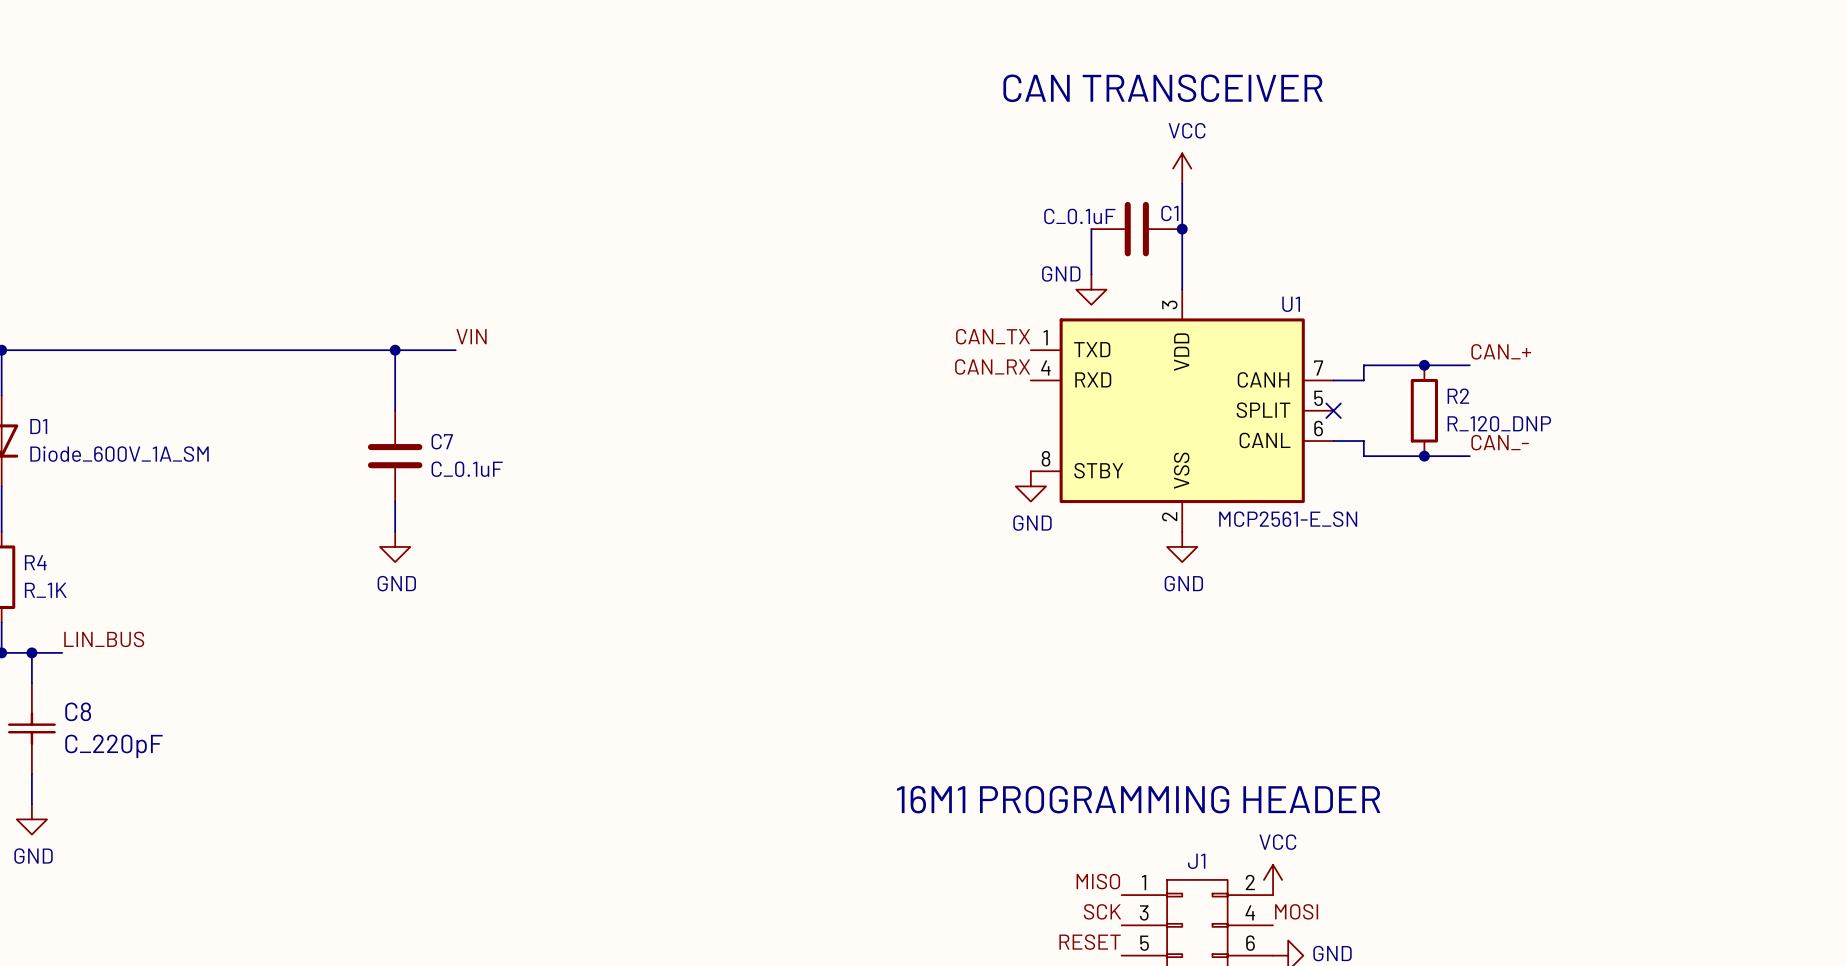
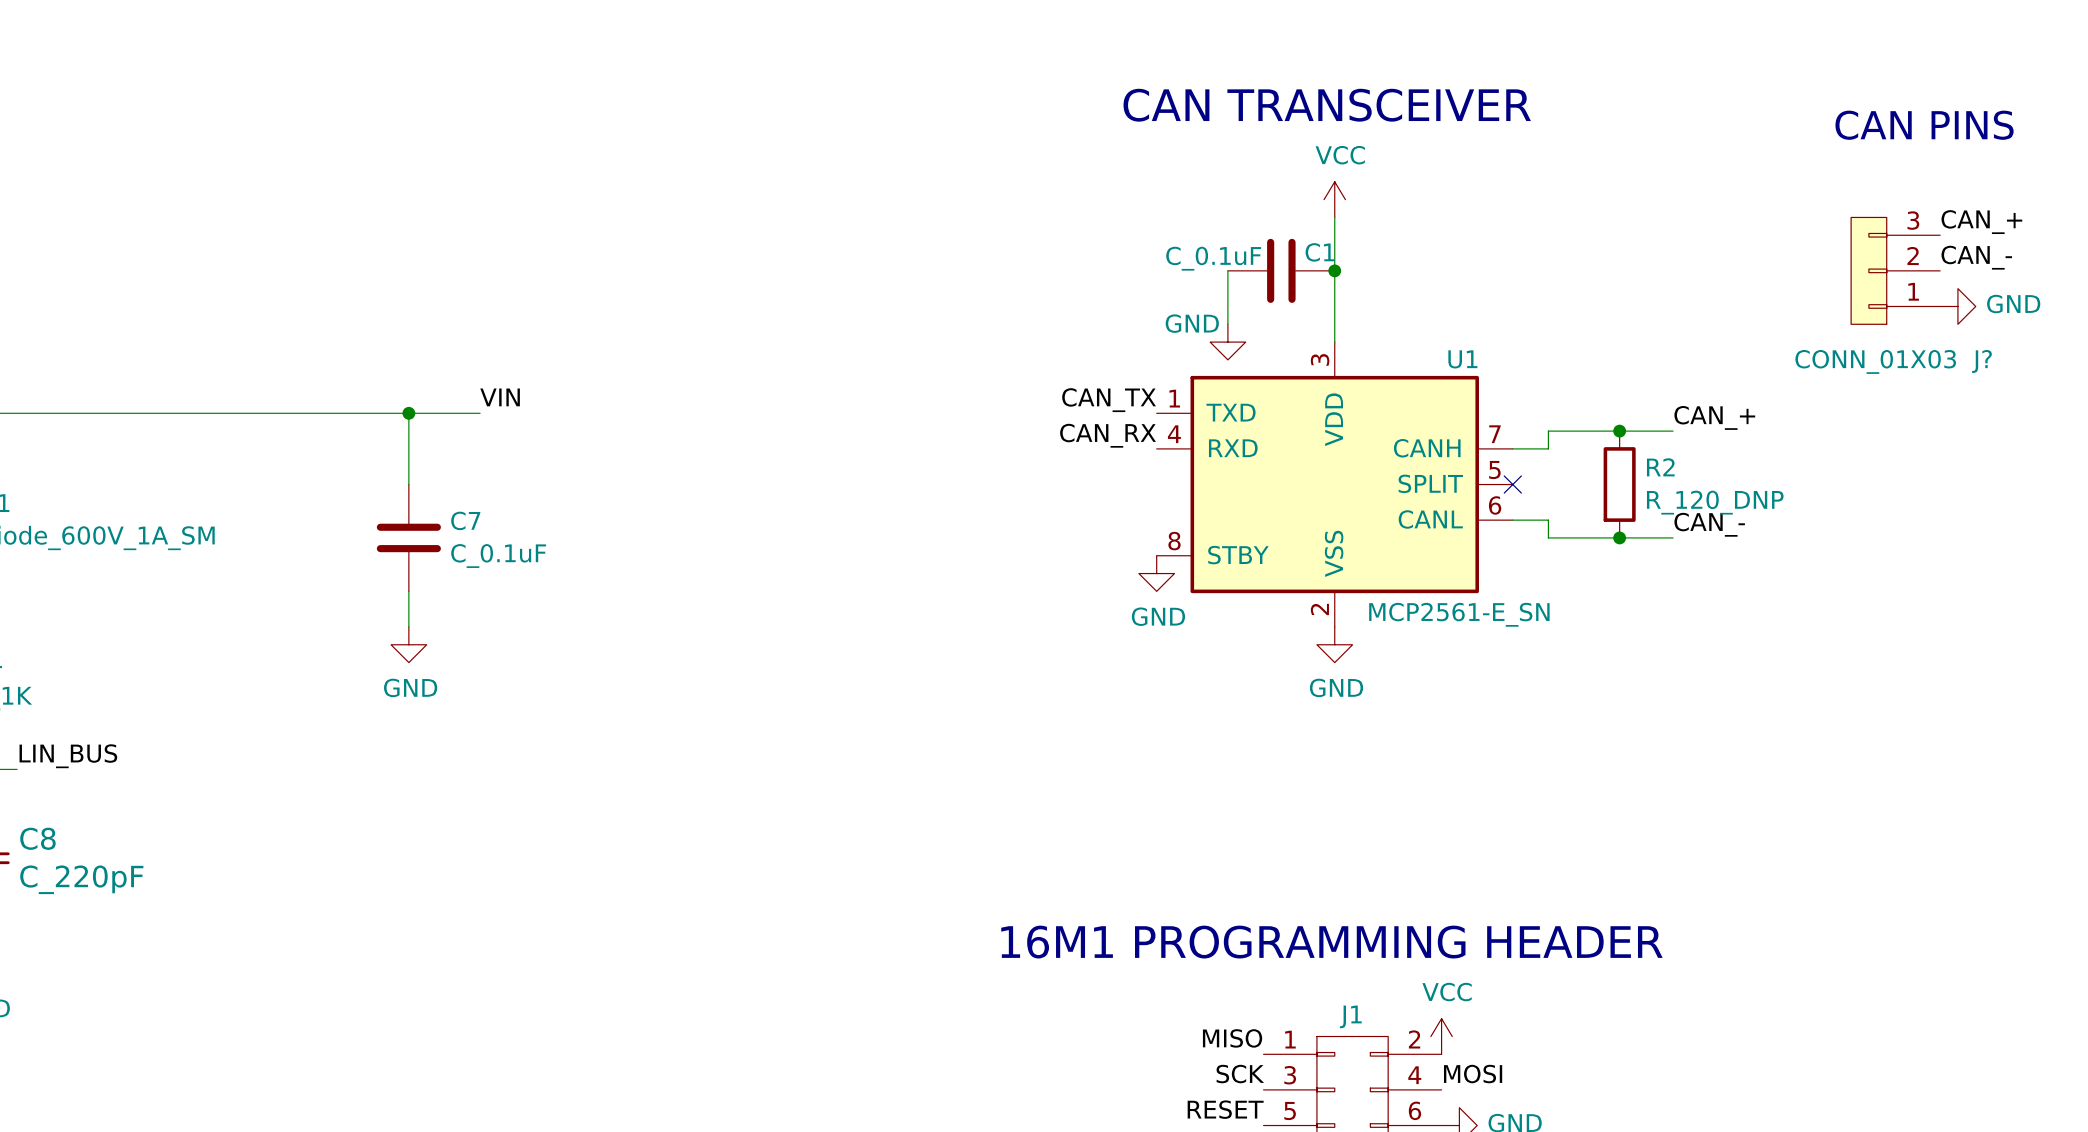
text: none -> CAN PINS (1924, 125)
label: none -> CAN_+ (1981, 222)
label: none -> CAN_- (1976, 257)
J?: none -> CONN_01X03 (1895, 270)
power symbol: none -> GND (1957, 306)

